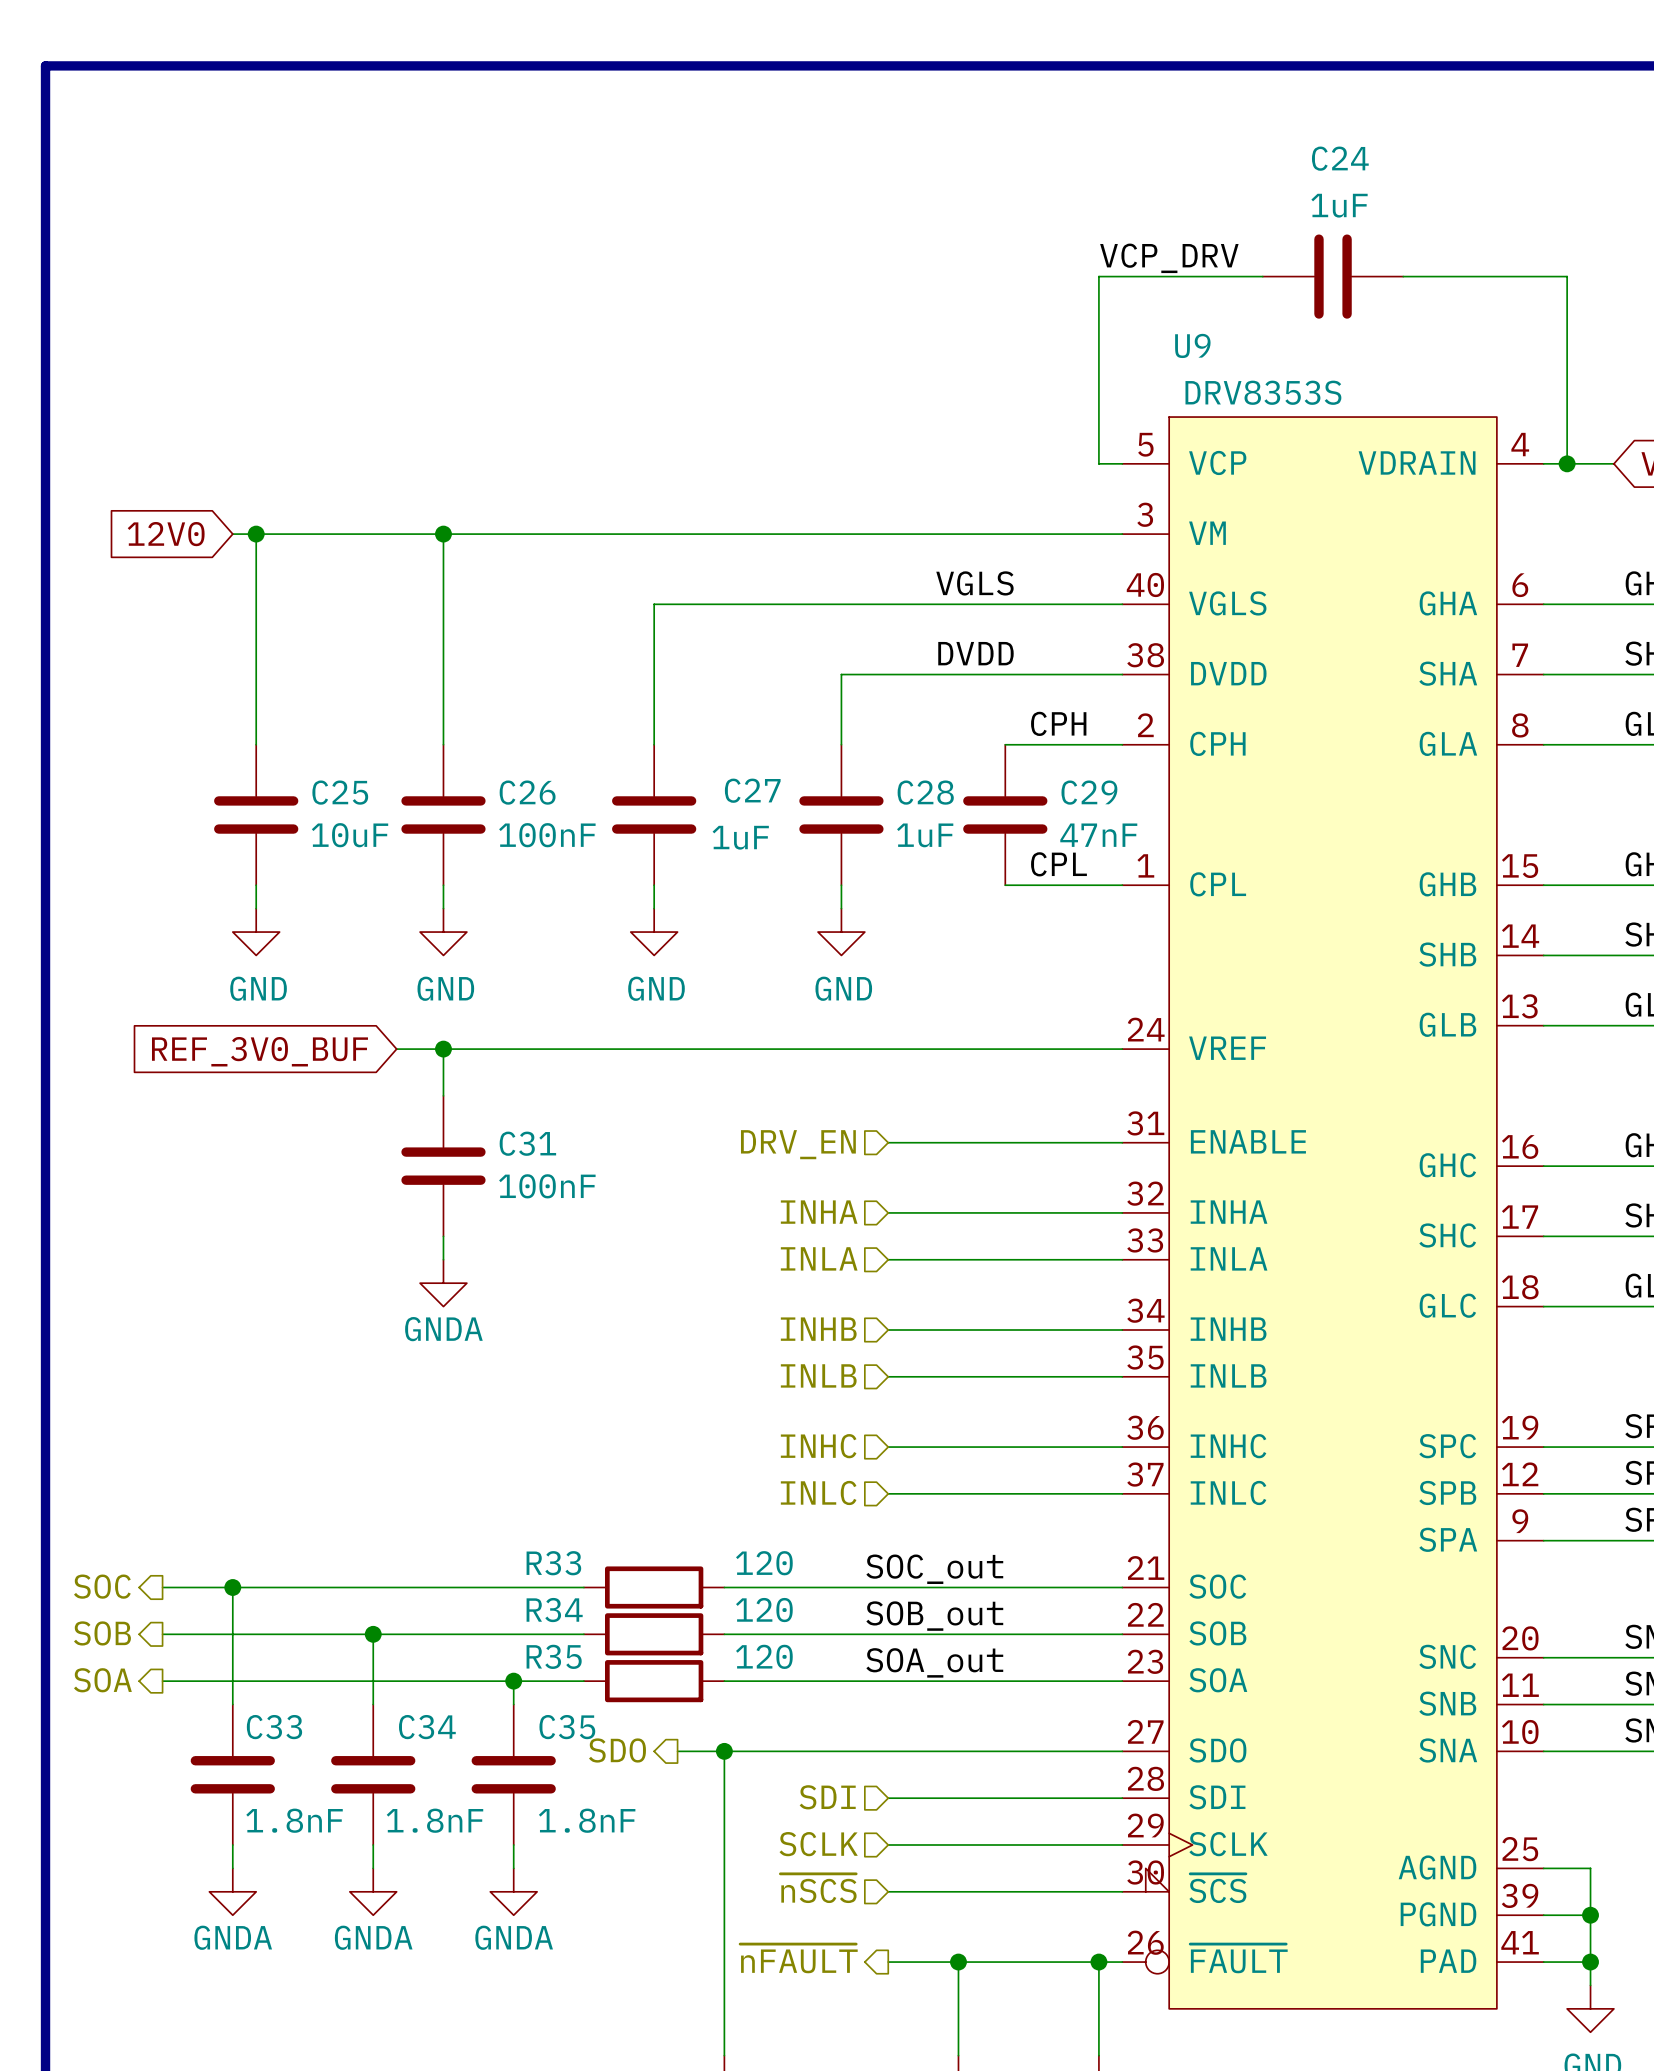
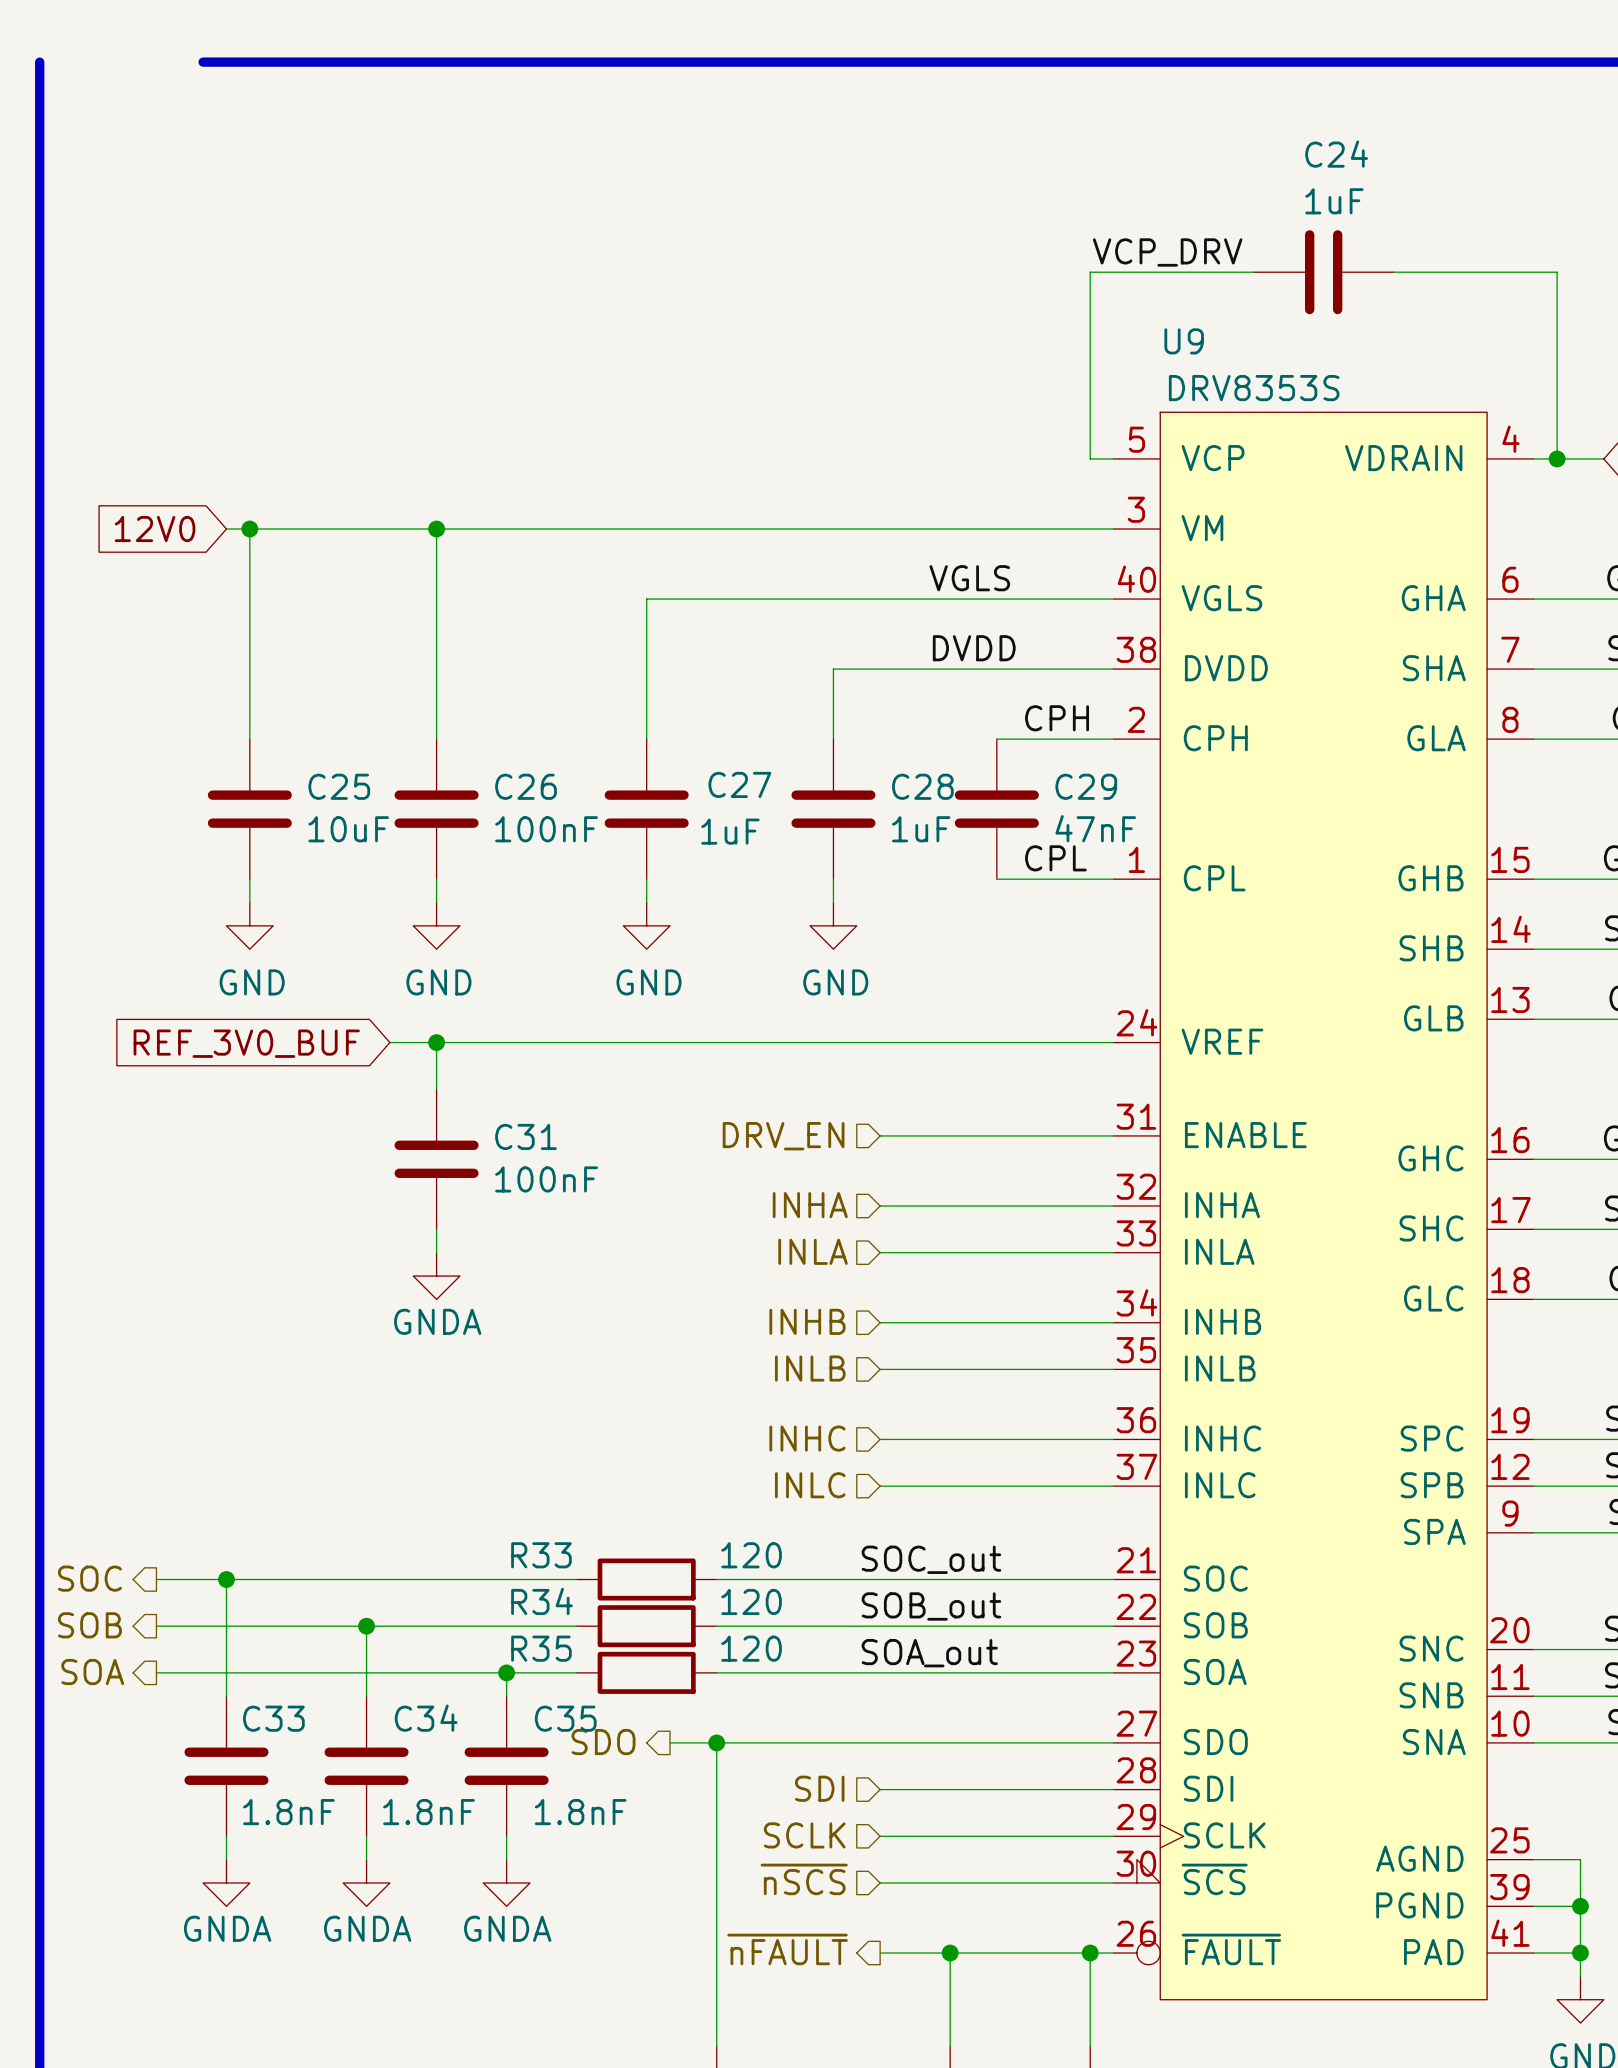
line: (45, 65) (209, 65) -> none

